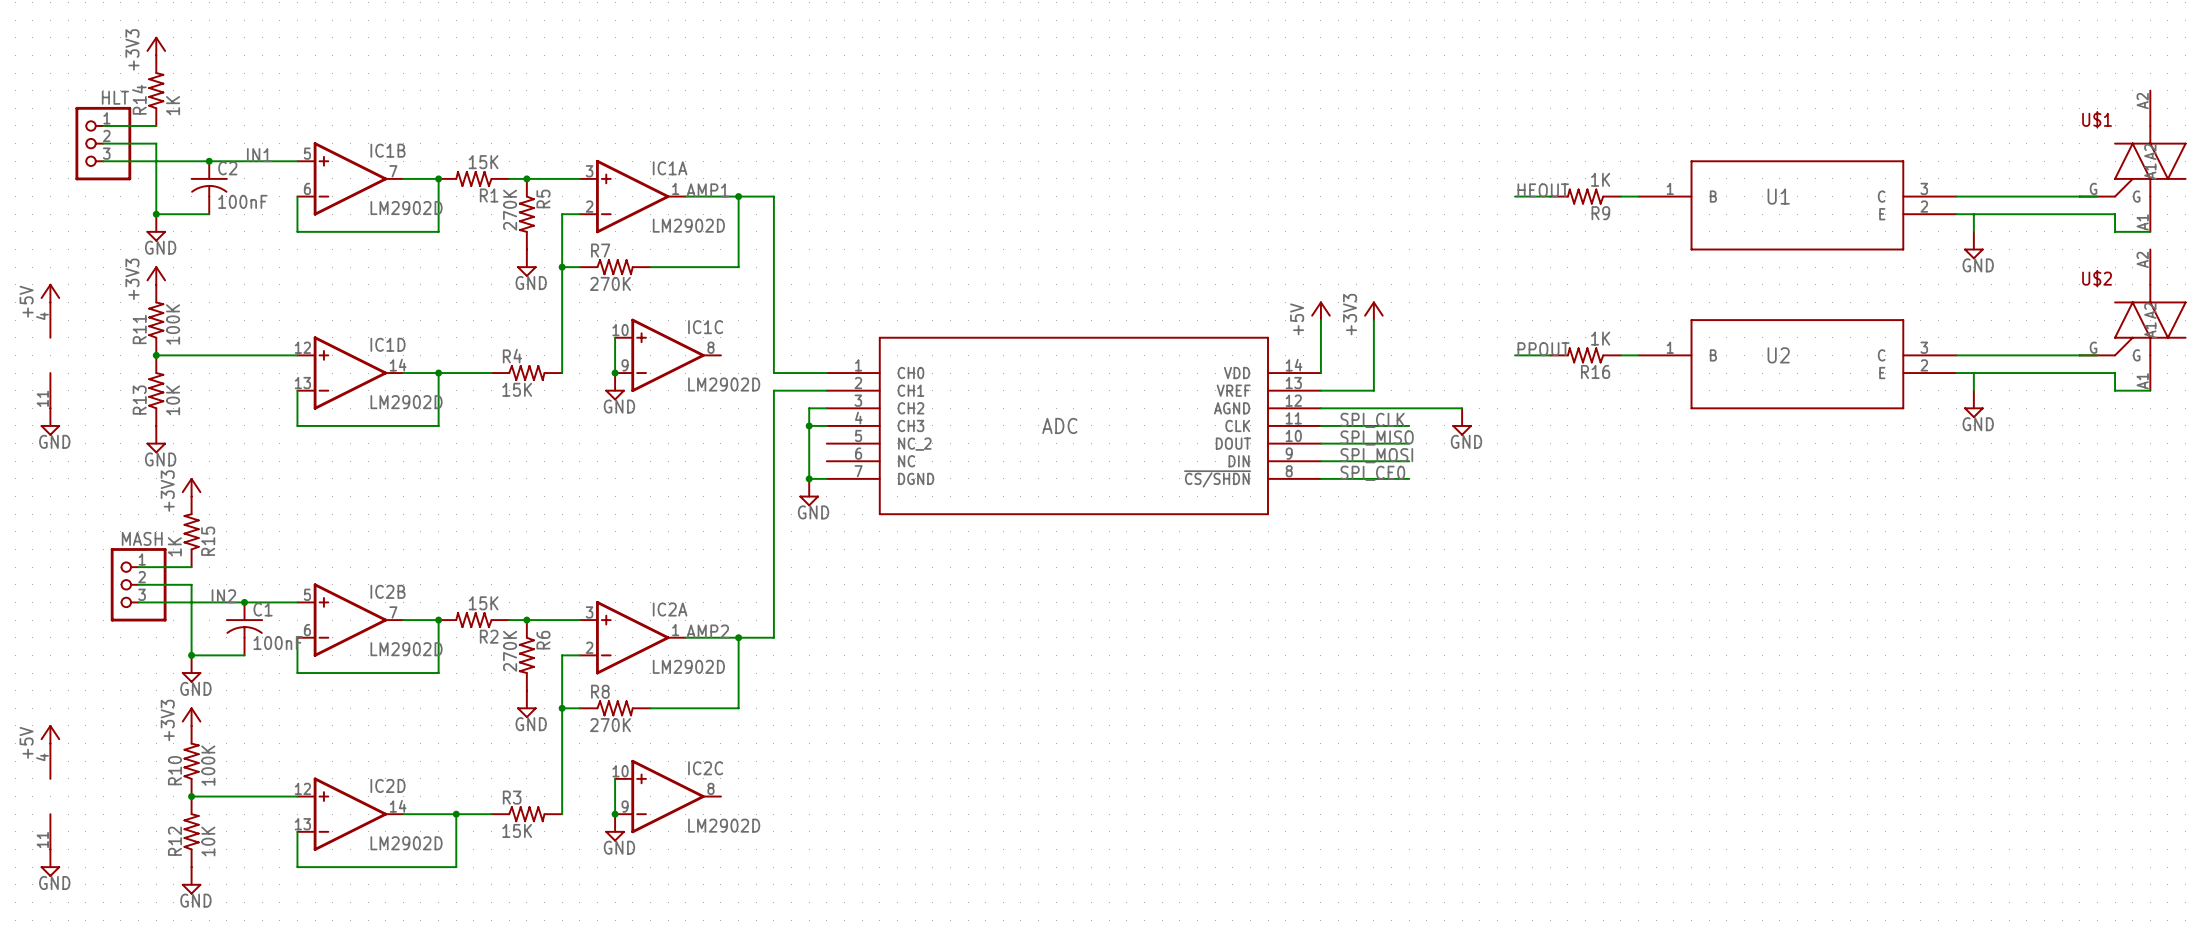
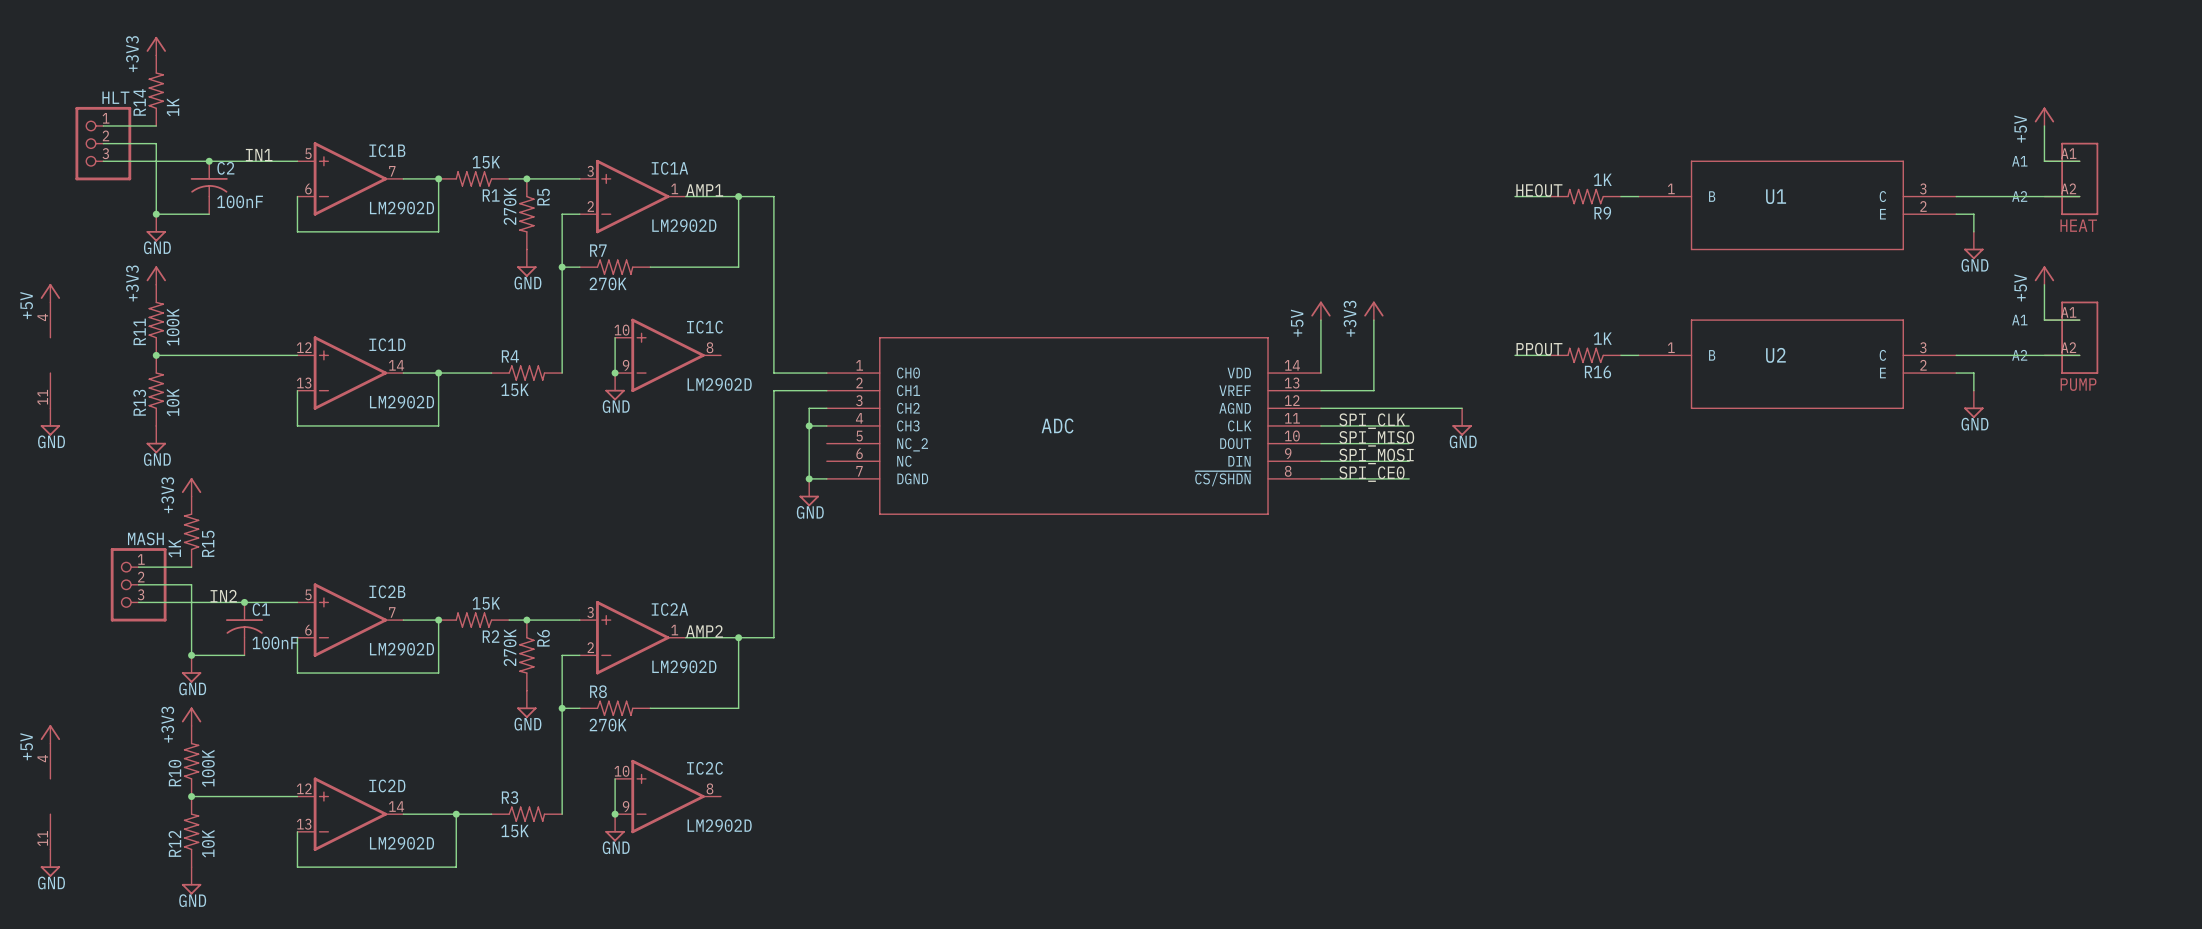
power symbol: none -> +5V (2044, 116)
wire: none -> (2044, 125) (2044, 161) (2079, 161)
U$1: (2133, 161) -> none
HEAT: none -> (2071, 178)
wire: (2079, 196) (2097, 196) -> none
wire: (1973, 214) (2115, 214) (2115, 231) (2150, 231) -> none
power symbol: none -> +5V (2044, 275)
wire: none -> (2044, 284) (2044, 320) (2079, 320)
U$2: (2133, 320) -> none
PUMP: none -> (2071, 337)
wire: (2079, 355) (2097, 355) -> none
wire: (1973, 373) (2115, 373) (2115, 390) (2150, 390) -> none

